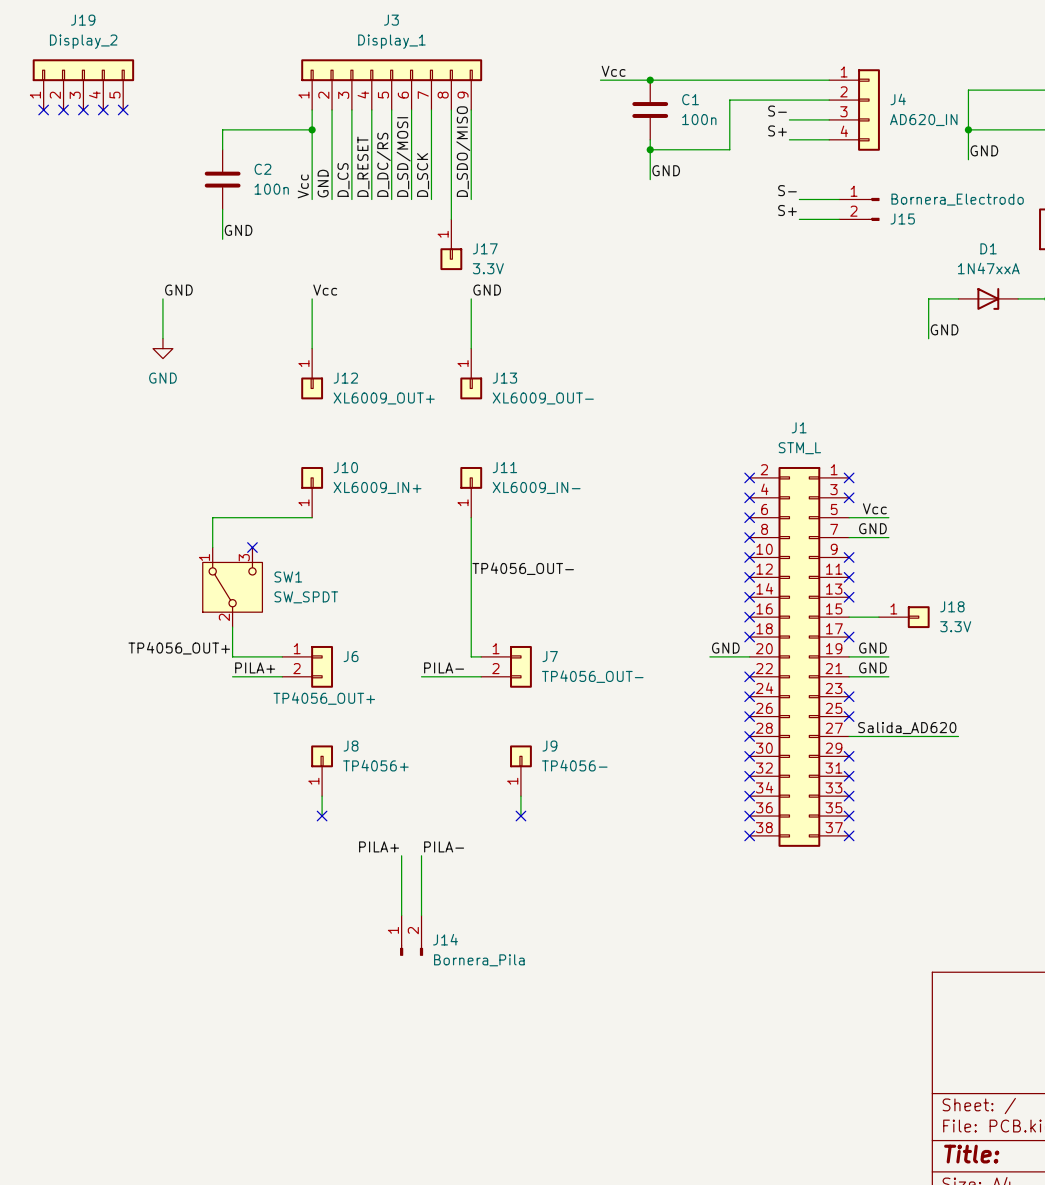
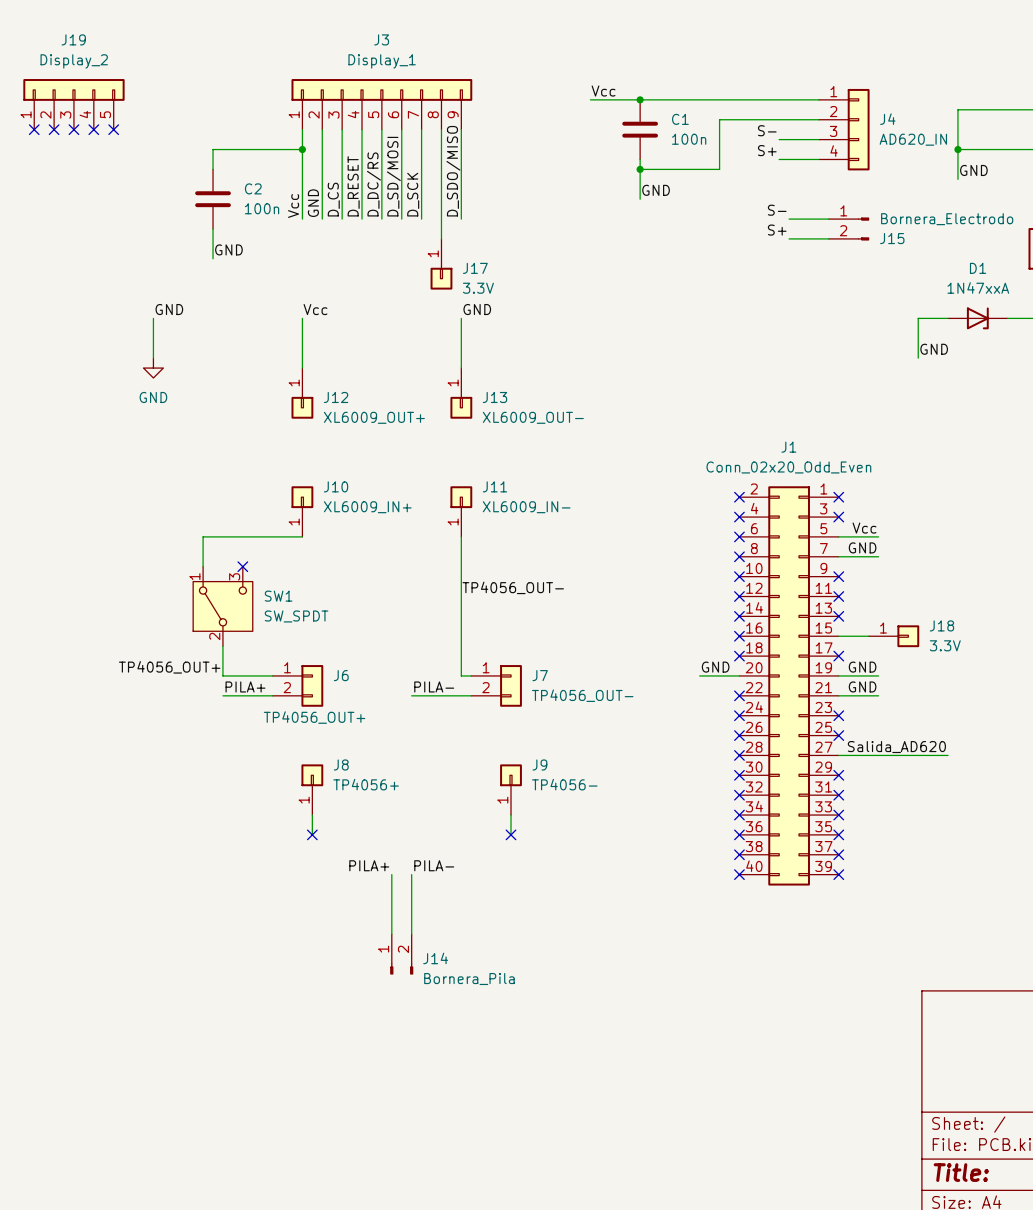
J1 value: STM_L (799, 448) -> Conn_02x20_Odd_Even (788, 467)
J1 symbol: [749, 466, 850, 847] -> [739, 486, 839, 886]
no-connect mark: none -> (739, 874)
no-connect mark: none -> (838, 874)

